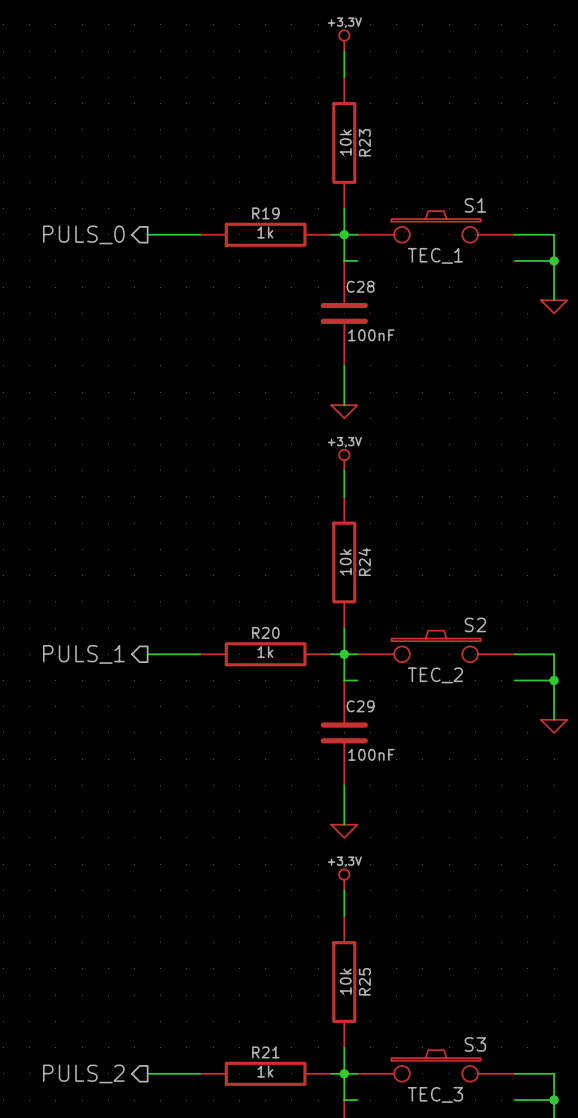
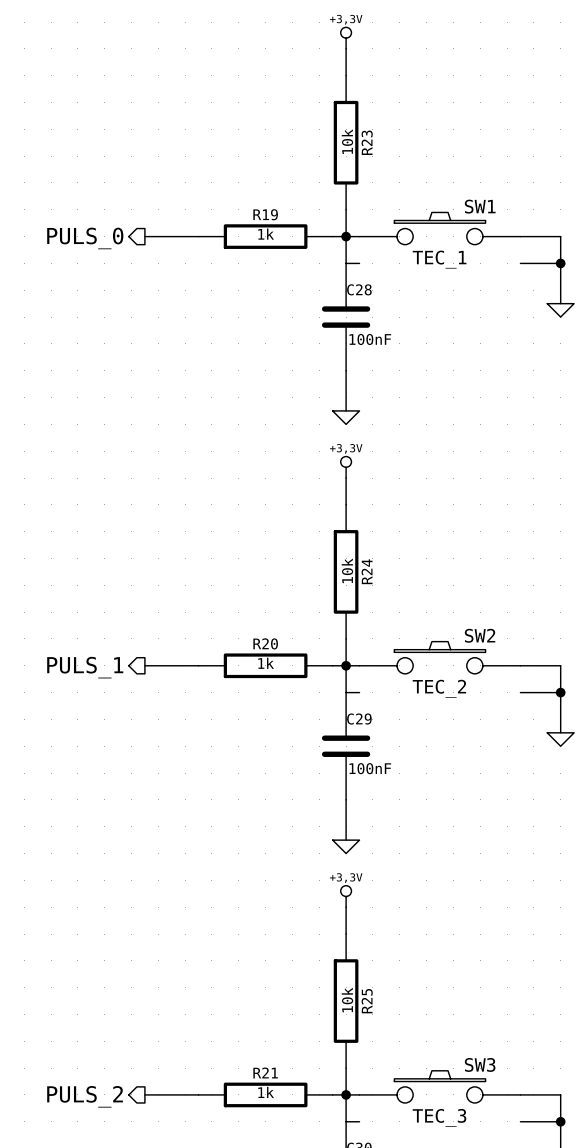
S1 name: S1 (475, 205) -> SW1 (480, 206)
S2 name: S2 (475, 624) -> SW2 (480, 635)
S3 name: S3 (475, 1044) -> SW3 (480, 1064)

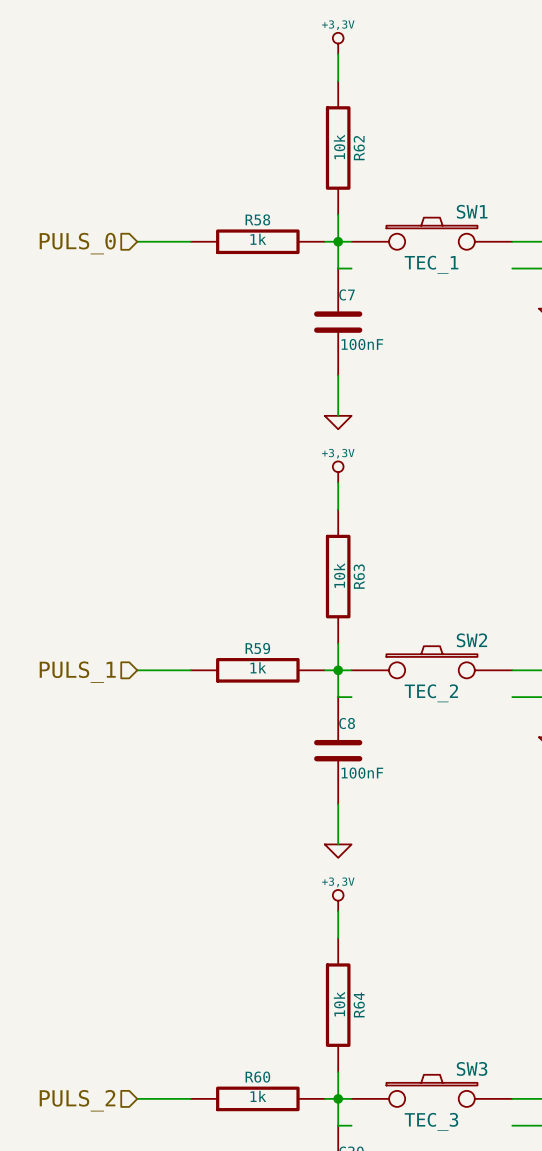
R23 name: R23 (367, 142) -> R62 (359, 148)
R19 name: R19 (265, 214) -> R58 (257, 219)
hierarchical label shape: output (85, 238) -> input (77, 243)
C28 name: C28 (359, 289) -> C7 (346, 294)
R24 name: R24 (367, 571) -> R63 (359, 576)
R20 name: R20 (265, 643) -> R59 (257, 648)
hierarchical label shape: output (85, 667) -> input (77, 672)
C29 name: C29 (359, 719) -> C8 (347, 723)
R25 name: R25 (367, 1001) -> R64 (359, 1004)
R21 name: R21 (265, 1072) -> R60 (257, 1077)
hierarchical label shape: output (85, 1096) -> input (77, 1100)

